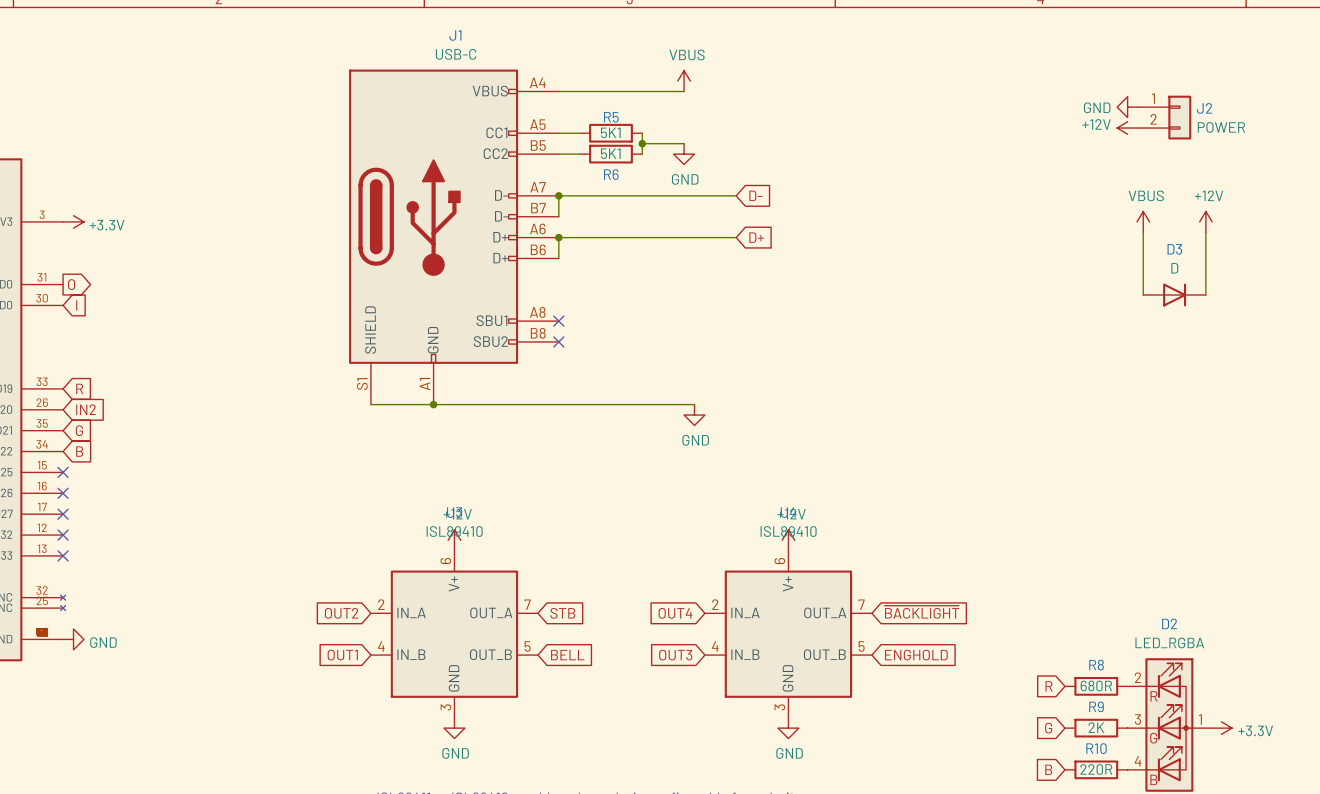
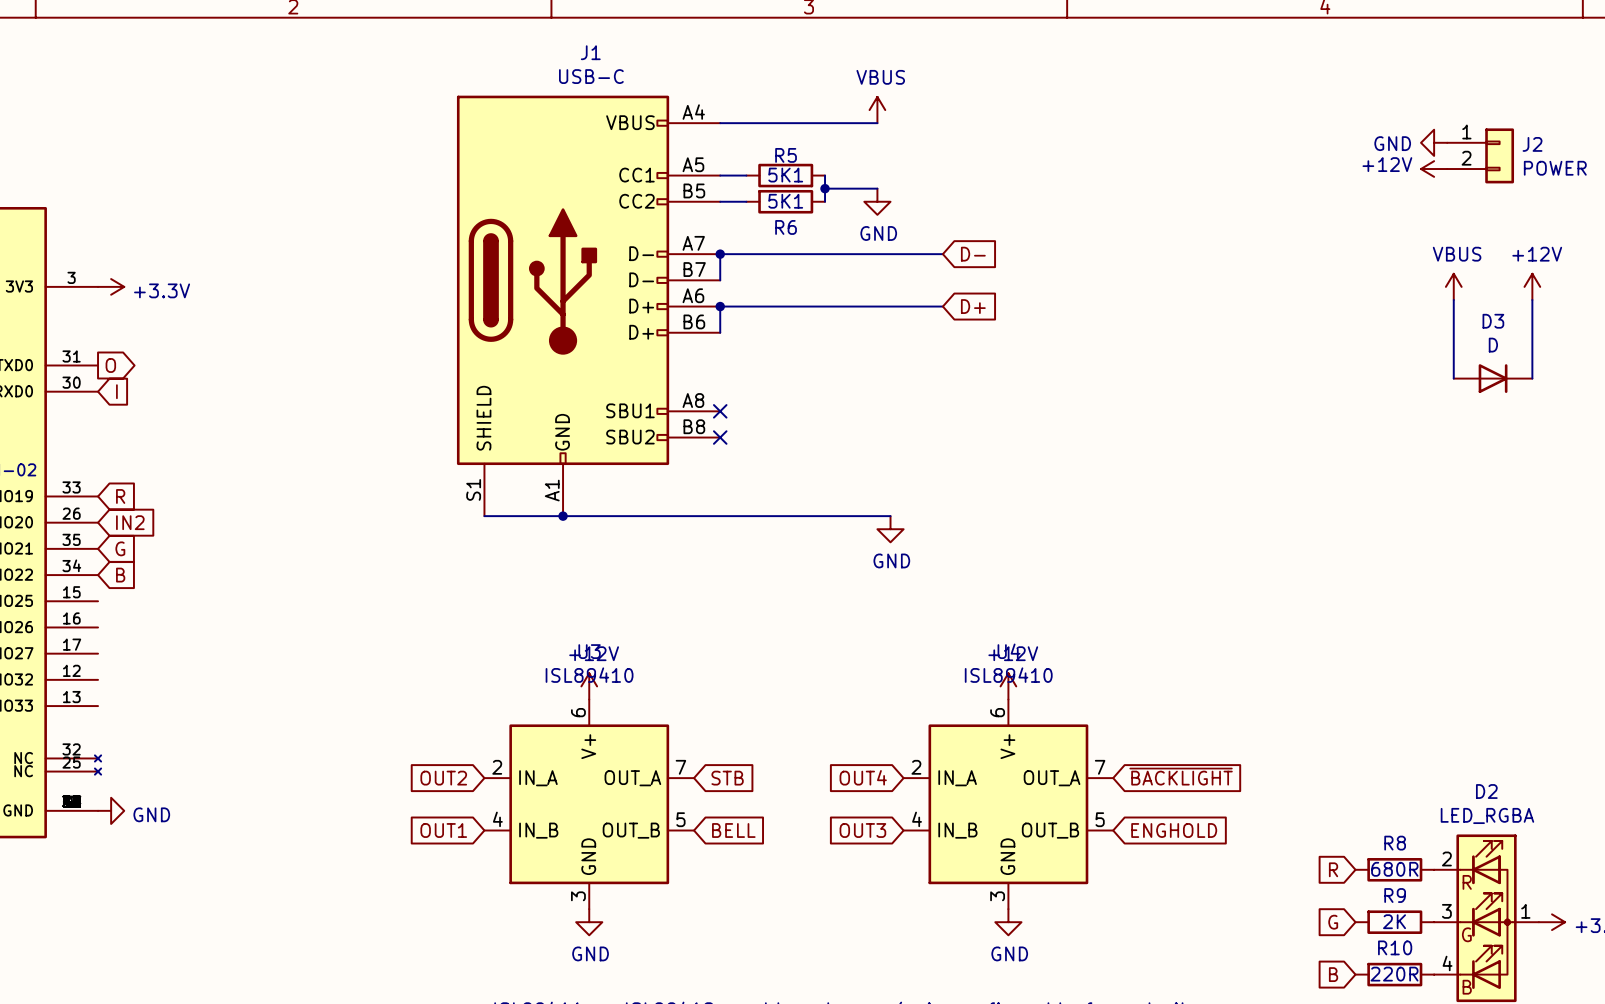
no-connect mark: (63, 472) -> none
no-connect mark: (63, 493) -> none
no-connect mark: (63, 514) -> none
no-connect mark: (63, 535) -> none
no-connect mark: (63, 555) -> none

